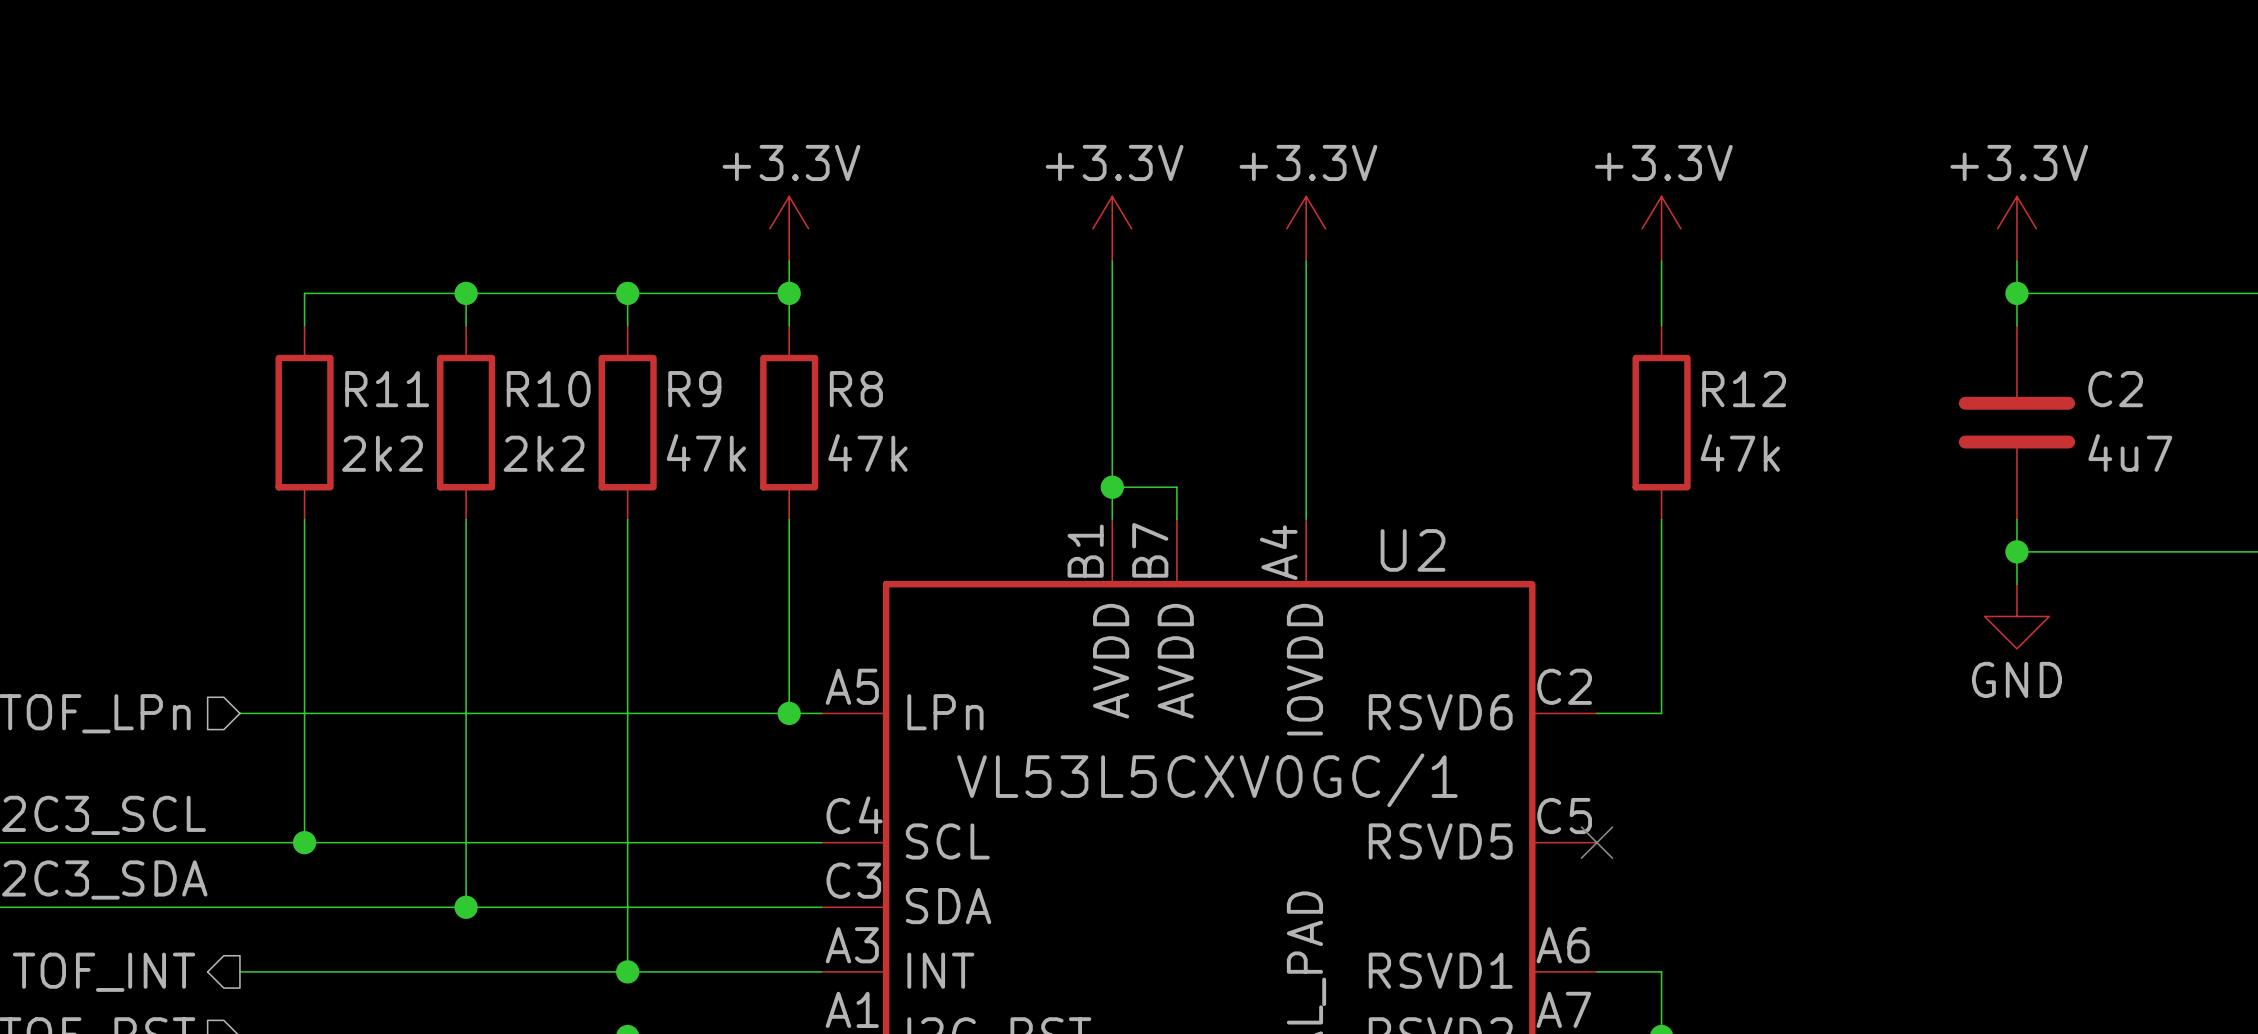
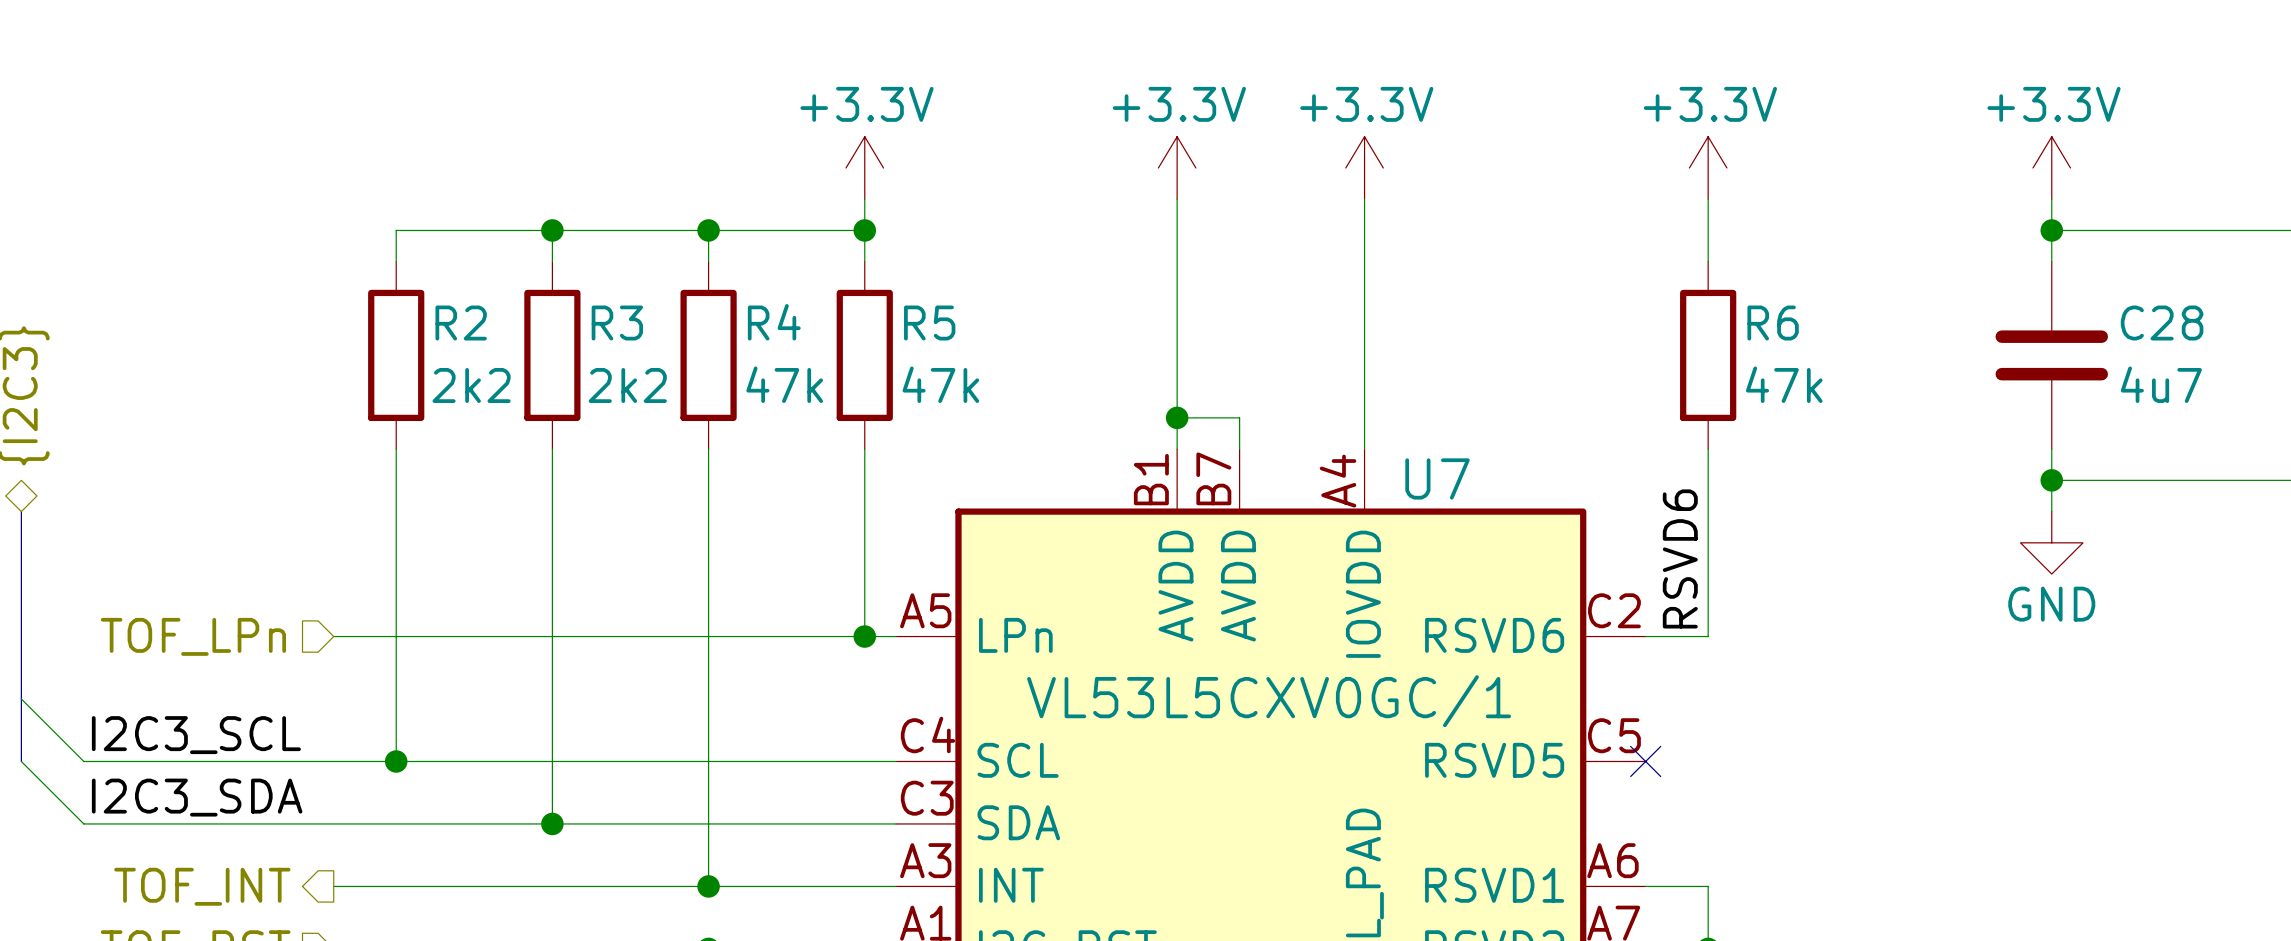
R11 name: R11 (387, 389) -> R2 (461, 323)
R10 name: R10 (548, 389) -> R3 (617, 323)
R9 name: R9 (694, 389) -> R4 (774, 322)
R8 name: R8 (856, 389) -> R5 (929, 323)
R12 name: R12 (1744, 389) -> R6 (1773, 323)
C2 name: C2 (2115, 389) -> C28 (2162, 323)
U2 name: U2 (1413, 550) -> U7 (1437, 478)
label: none -> RSVD6 (1680, 558)

